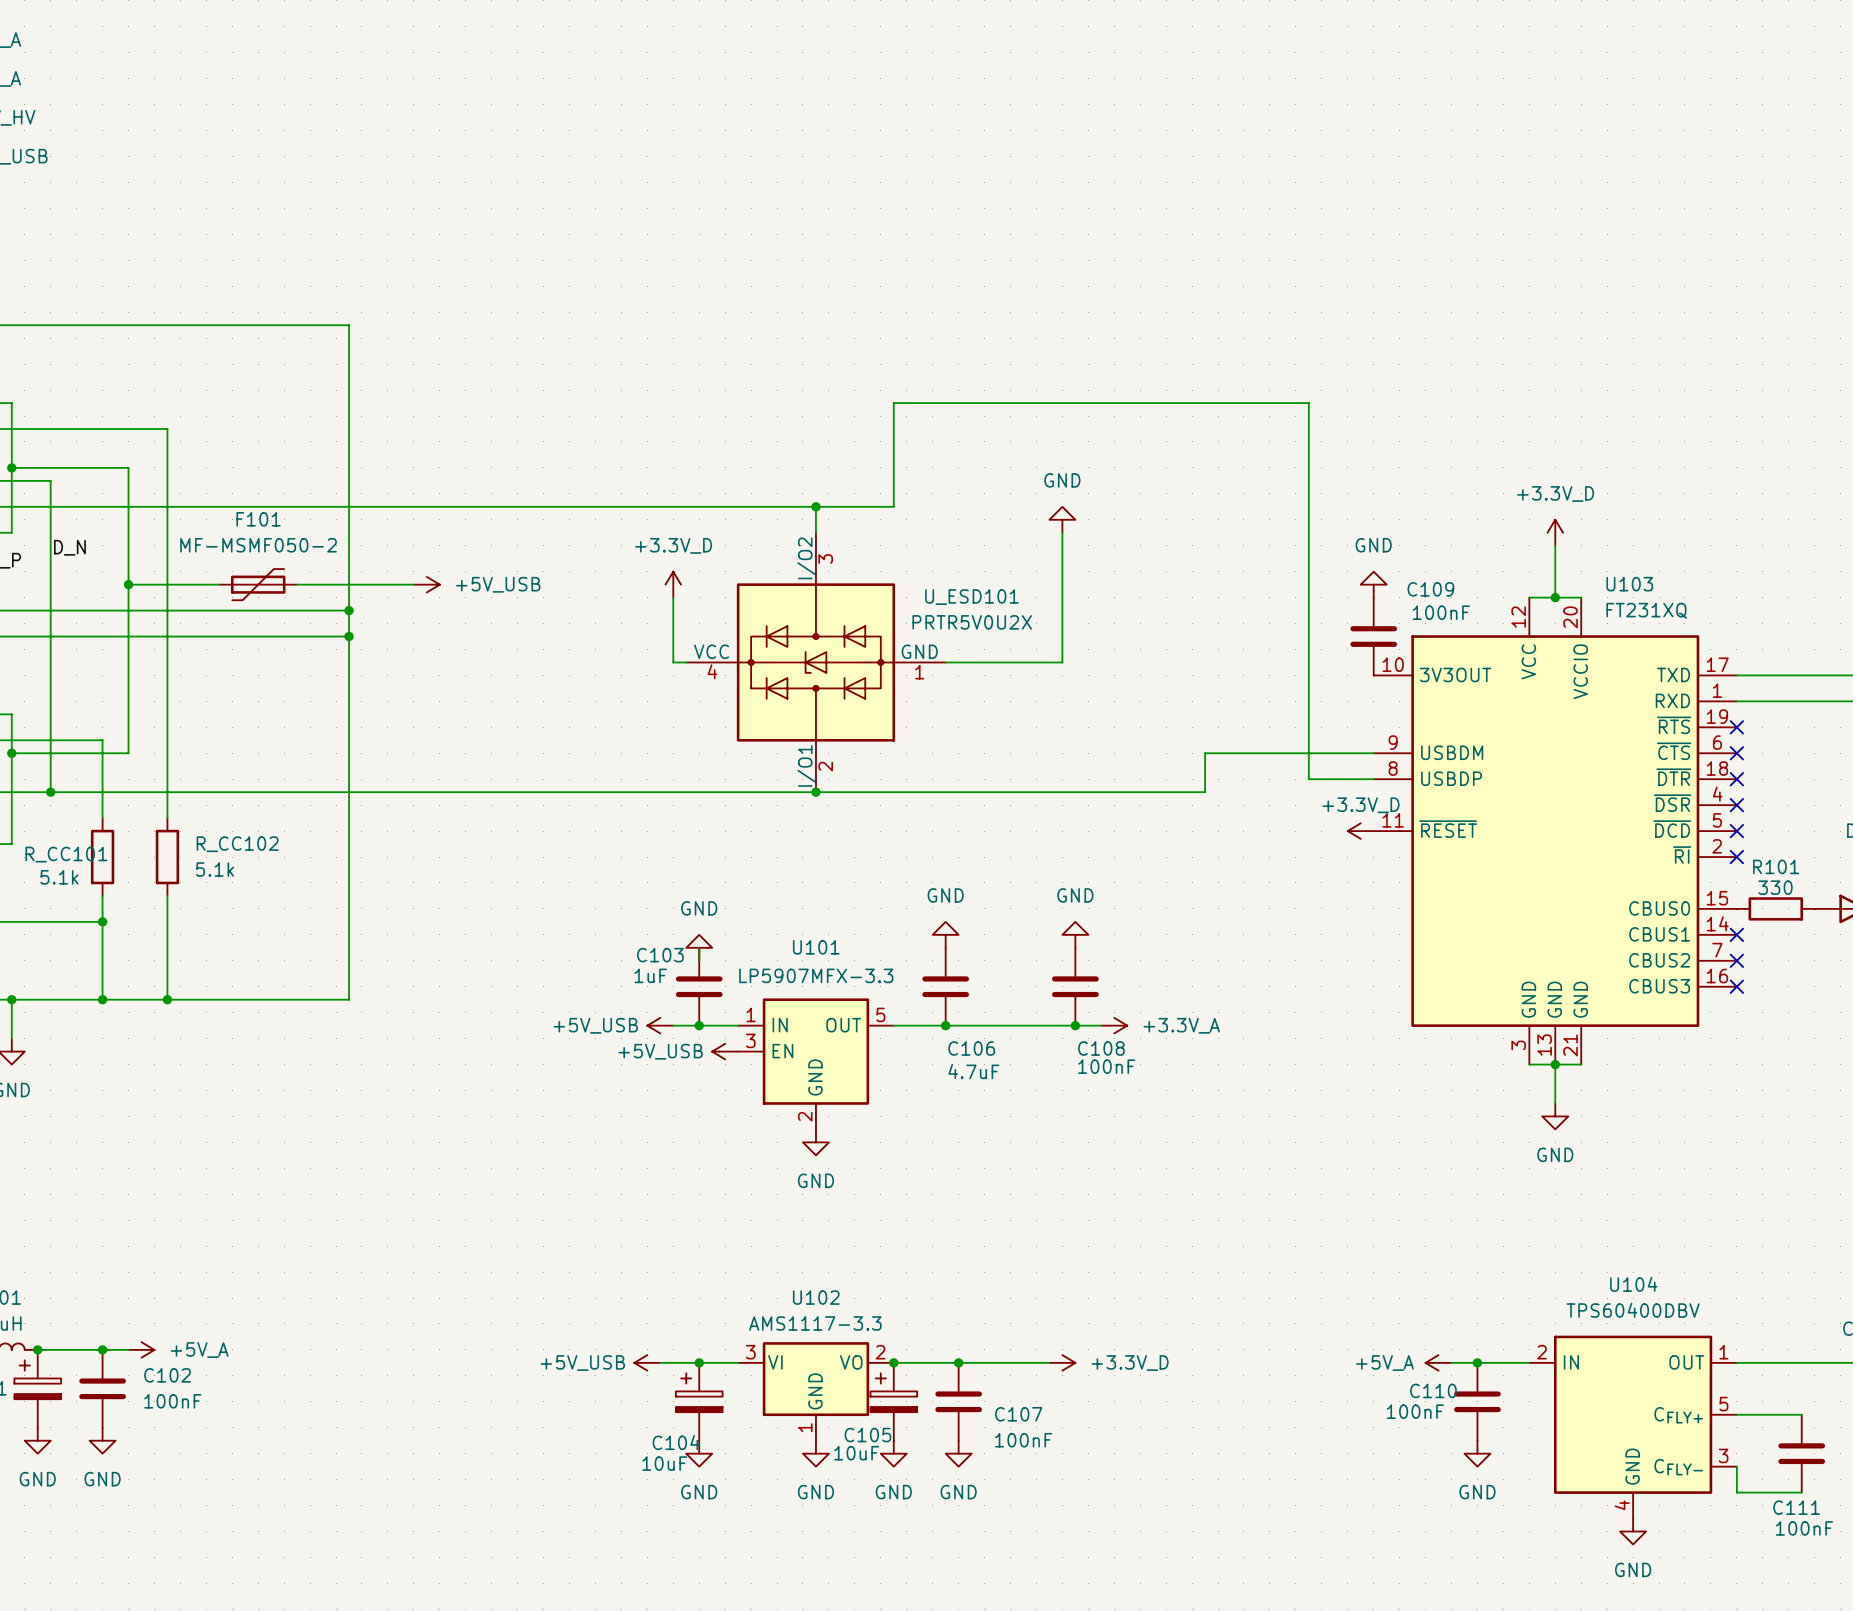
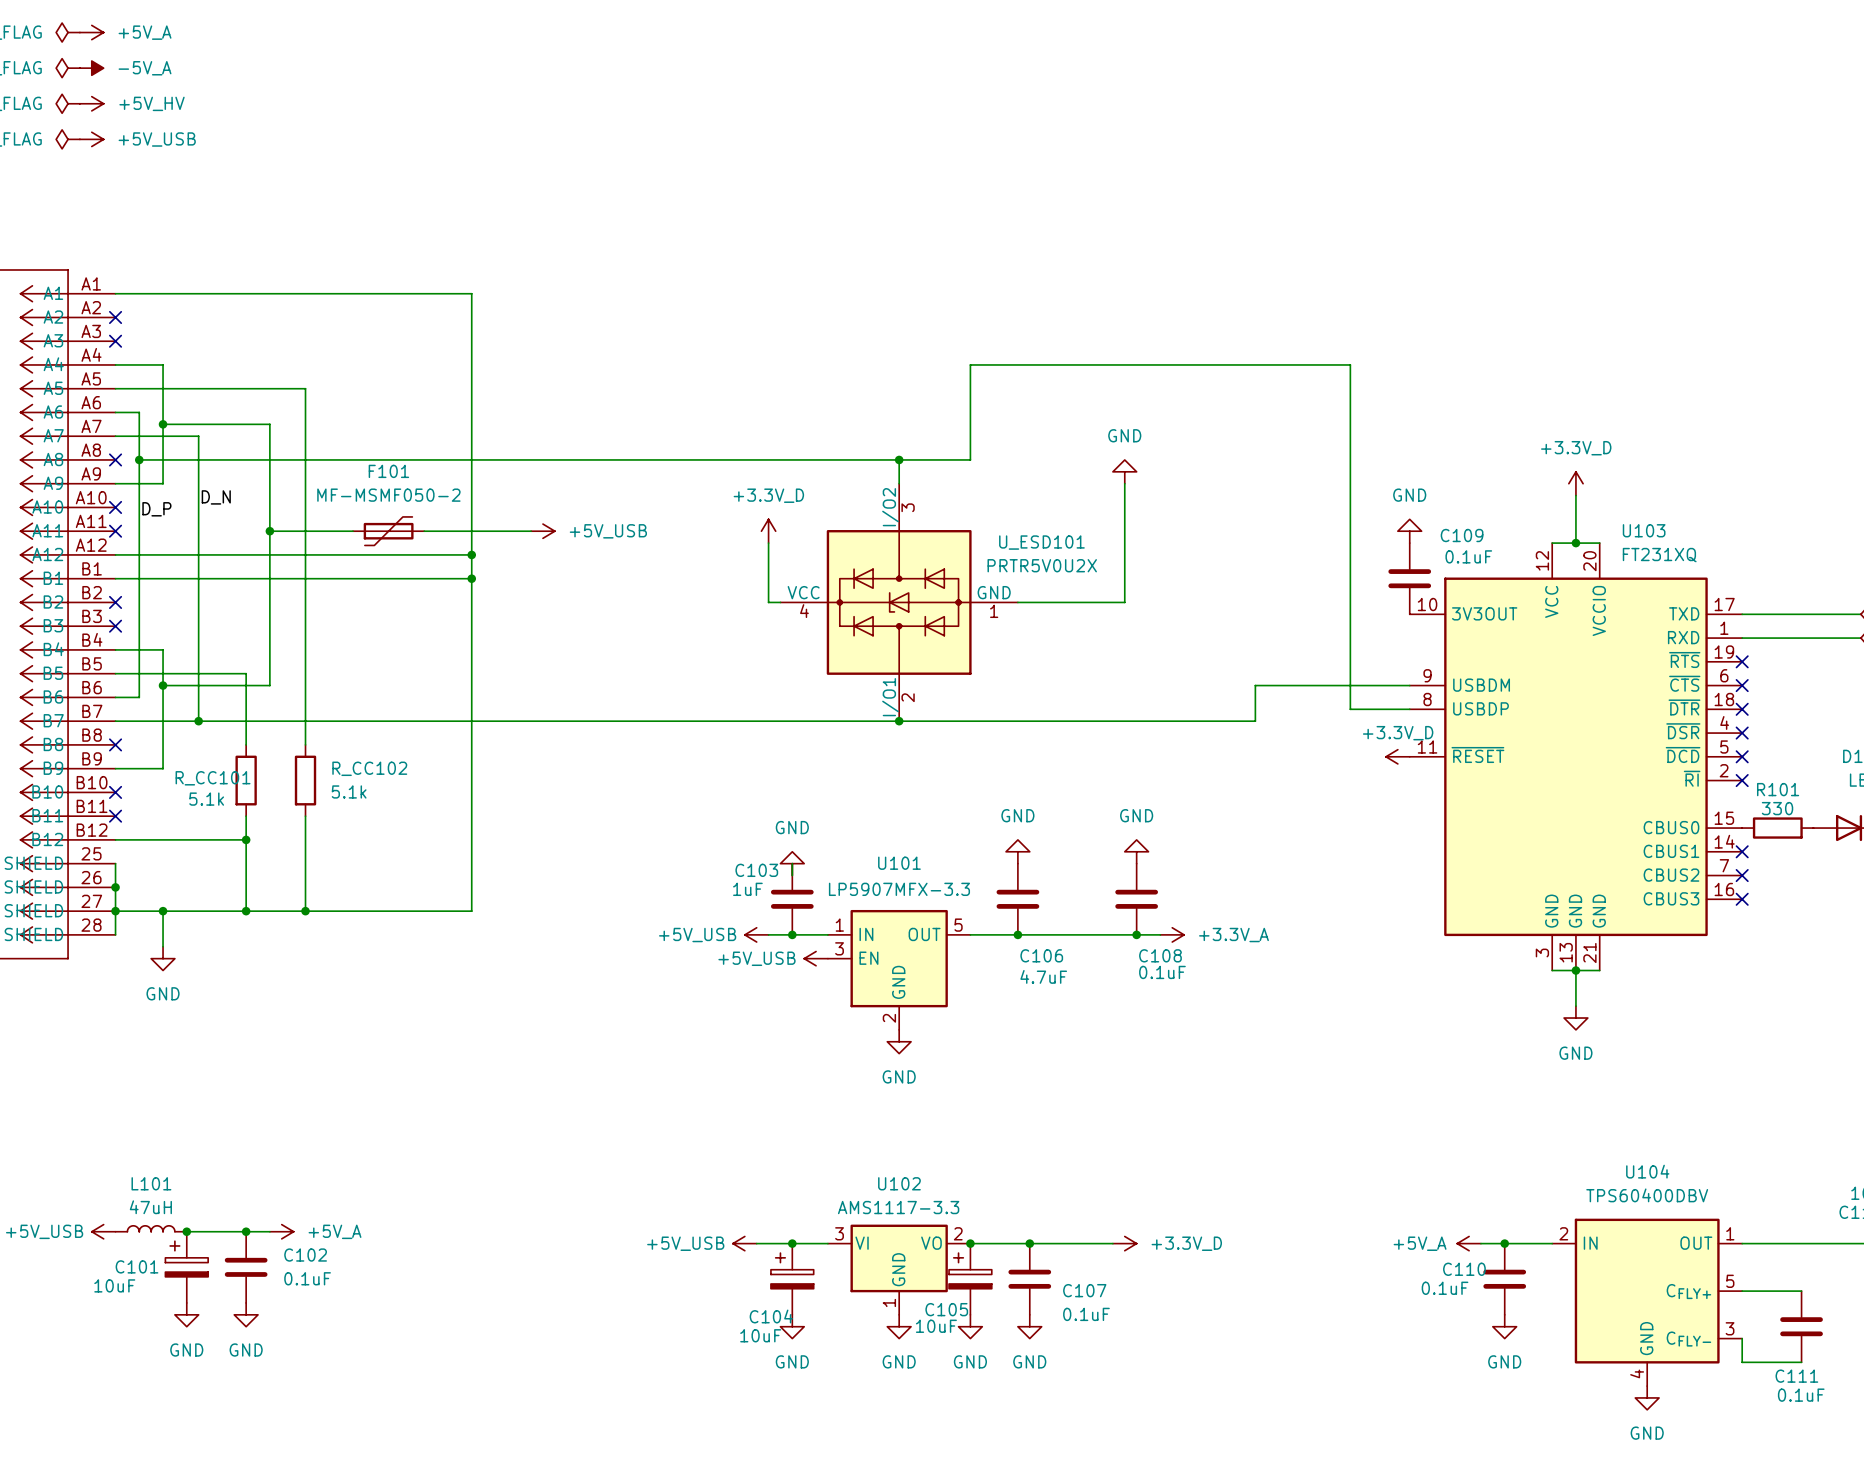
C109 value: 100nF (1441, 612) -> 0.1uF (1468, 556)
C108 value: 100nF (1106, 1066) -> 0.1uF (1162, 972)
C102 value: 100nF (172, 1401) -> 0.1uF (307, 1278)
C110 value: 100nF (1415, 1411) -> 0.1uF (1445, 1288)
C107 value: 100nF (1023, 1440) -> 0.1uF (1086, 1314)
C111 value: 100nF (1804, 1528) -> 0.1uF (1801, 1395)

